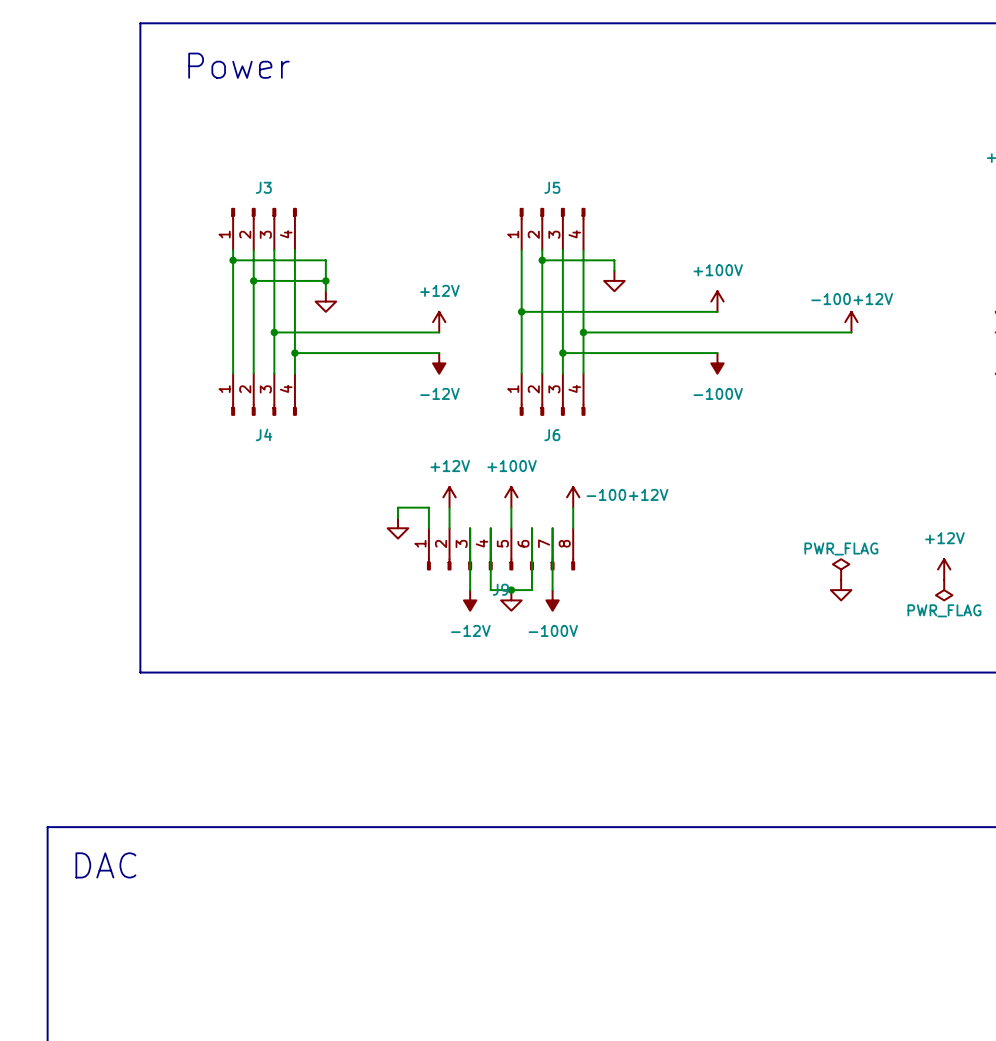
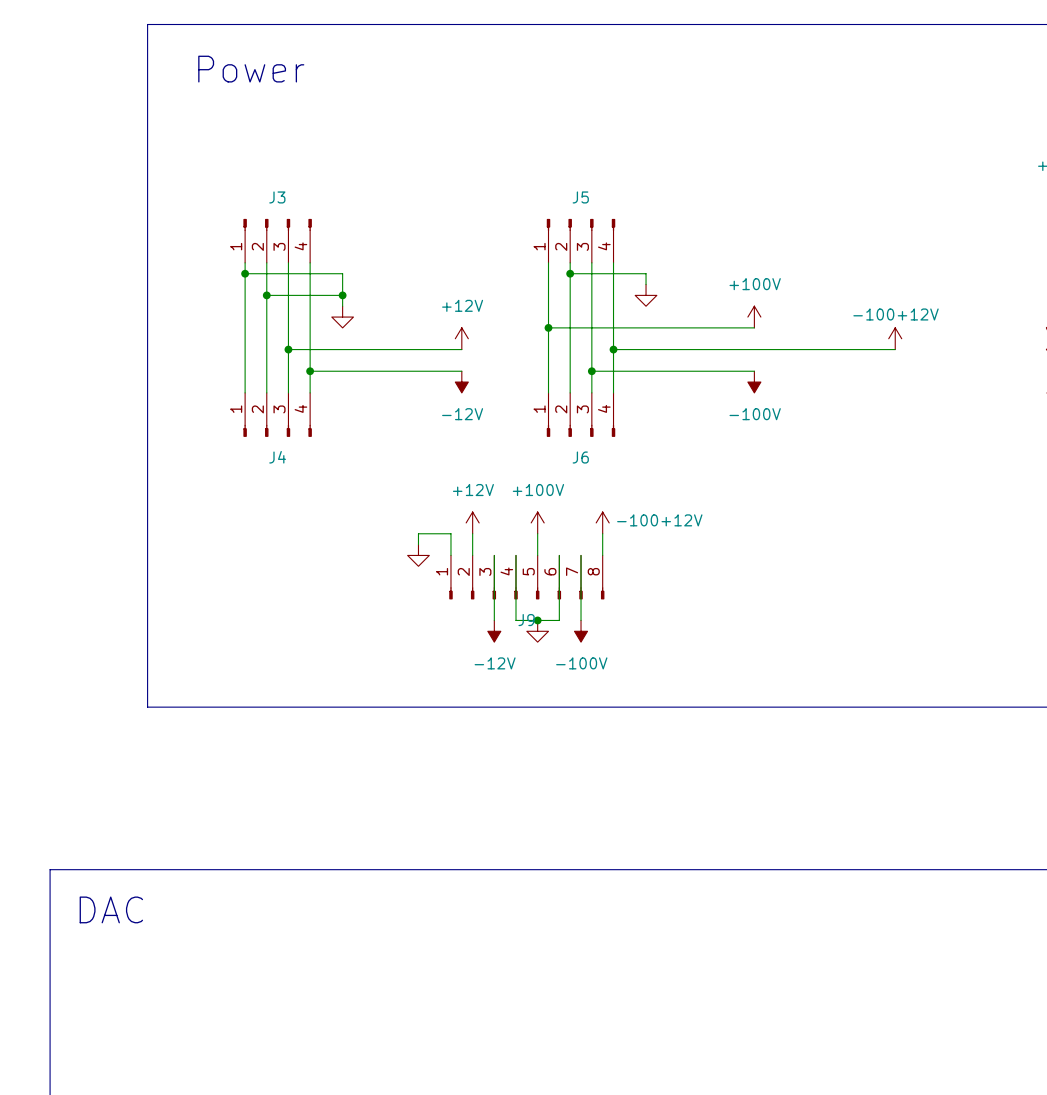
power symbol: PWR_FLAG (841, 569) -> none
power symbol: +12V (944, 569) -> none
power symbol: (841, 590) -> none
power symbol: PWR_FLAG (944, 590) -> none

